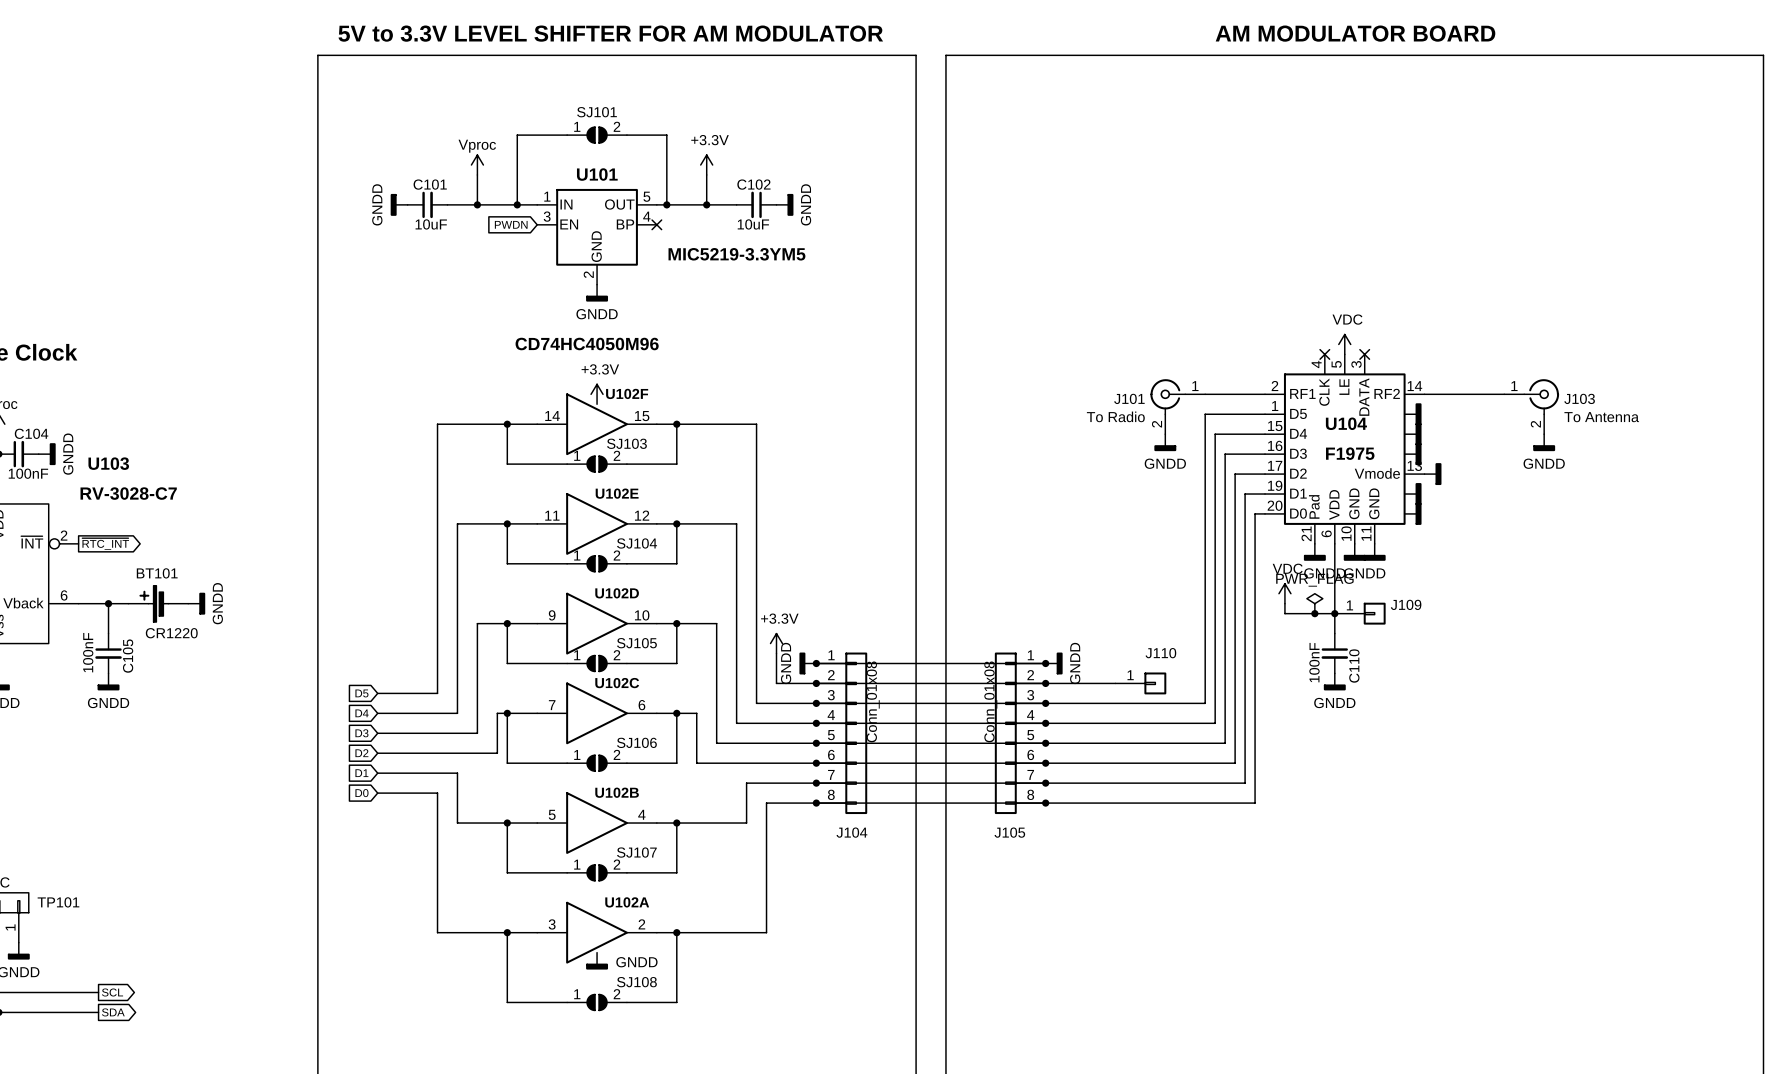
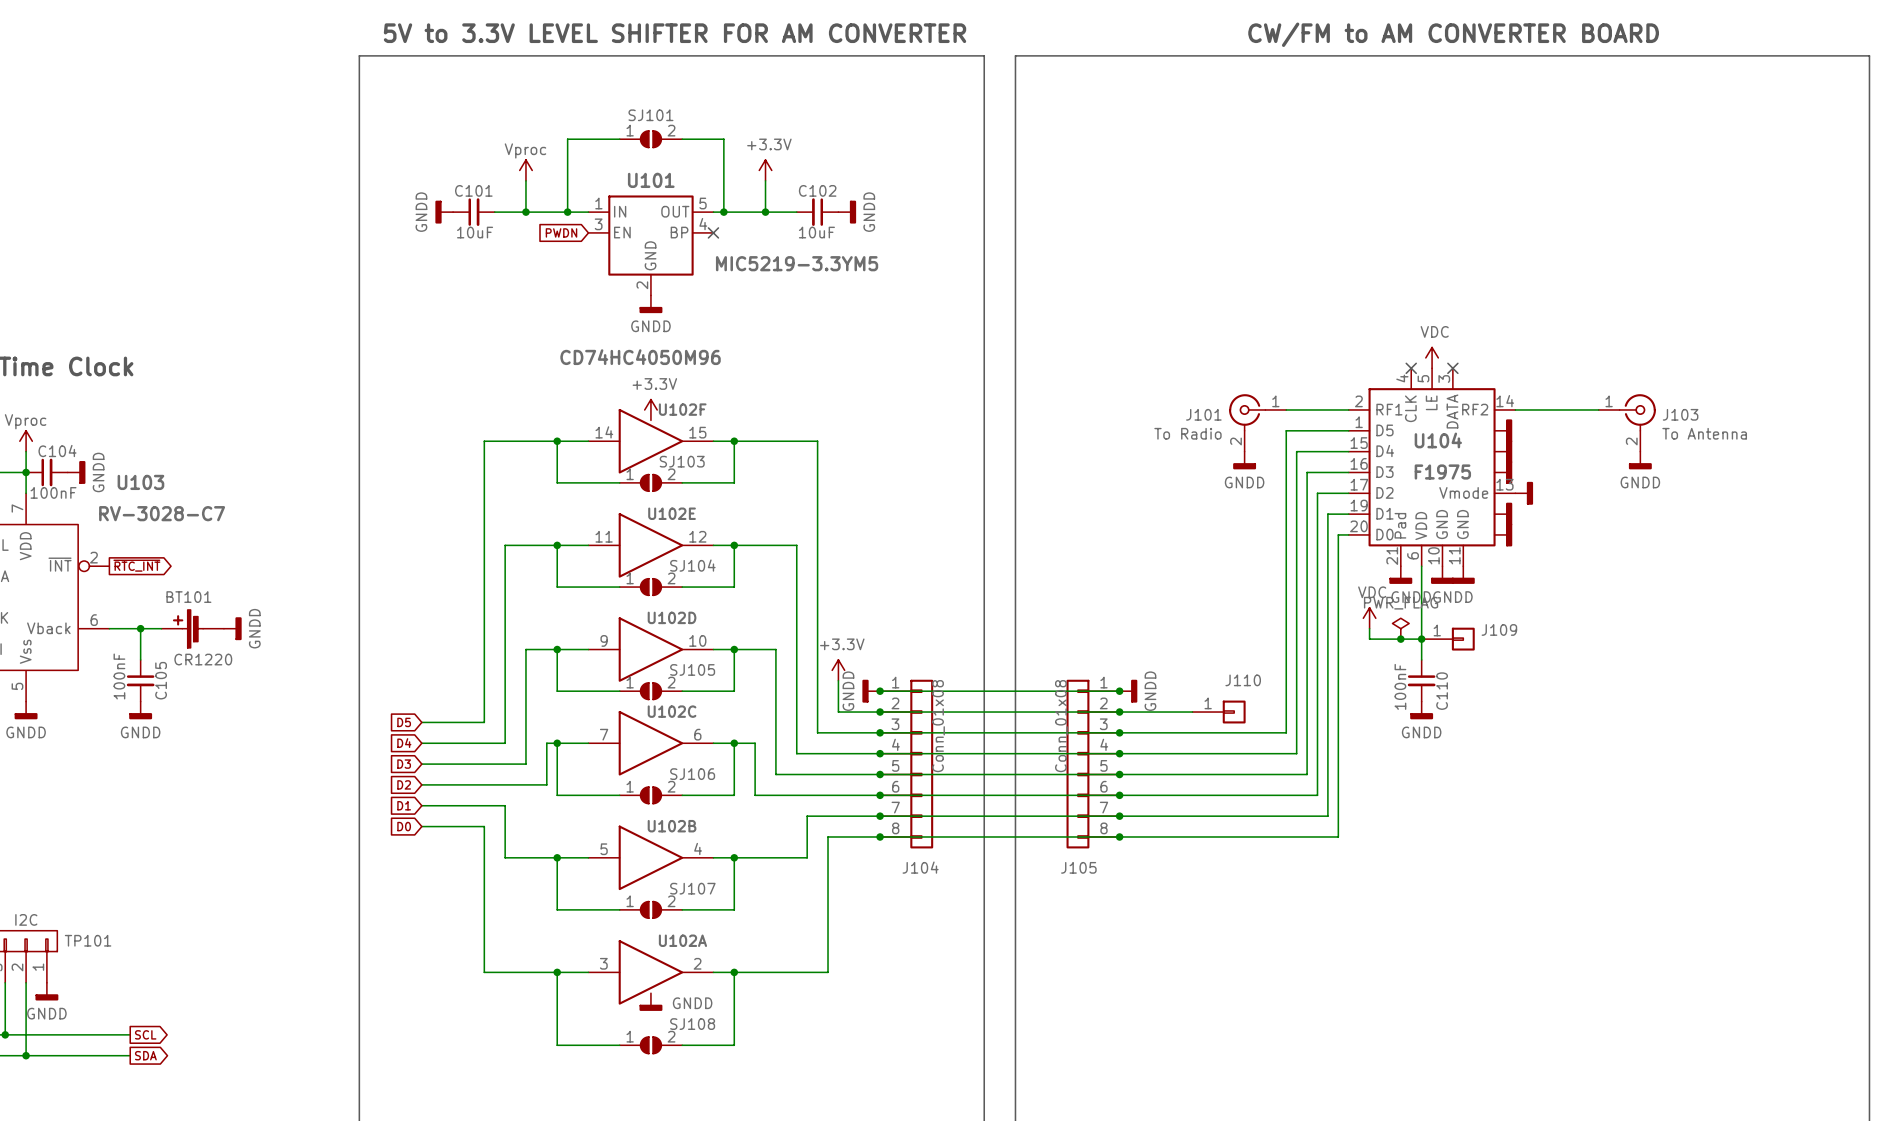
text: 5V to 3.3V LEVEL SHIFTER FOR AM MODULATOR (610, 33) -> 5V to 3.3V LEVEL SHIFTER FOR AM CONVERTER (675, 33)
text: AM MODULATOR BOARD (1355, 33) -> none
text: none -> CW/FM to AM CONVERTER BOARD (1453, 34)

